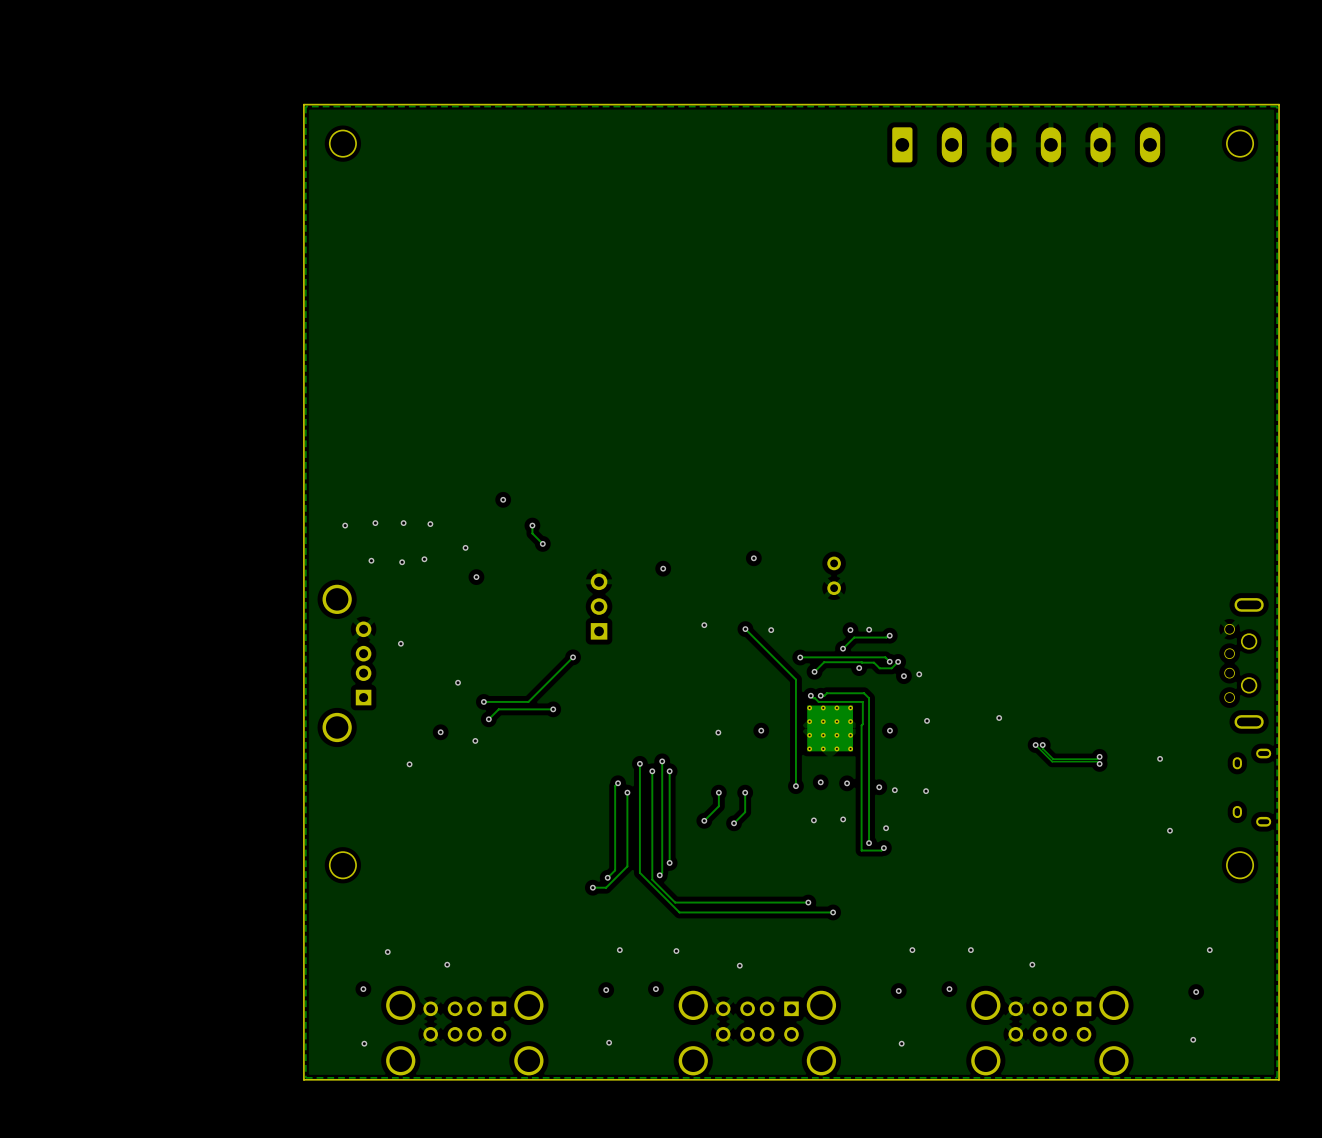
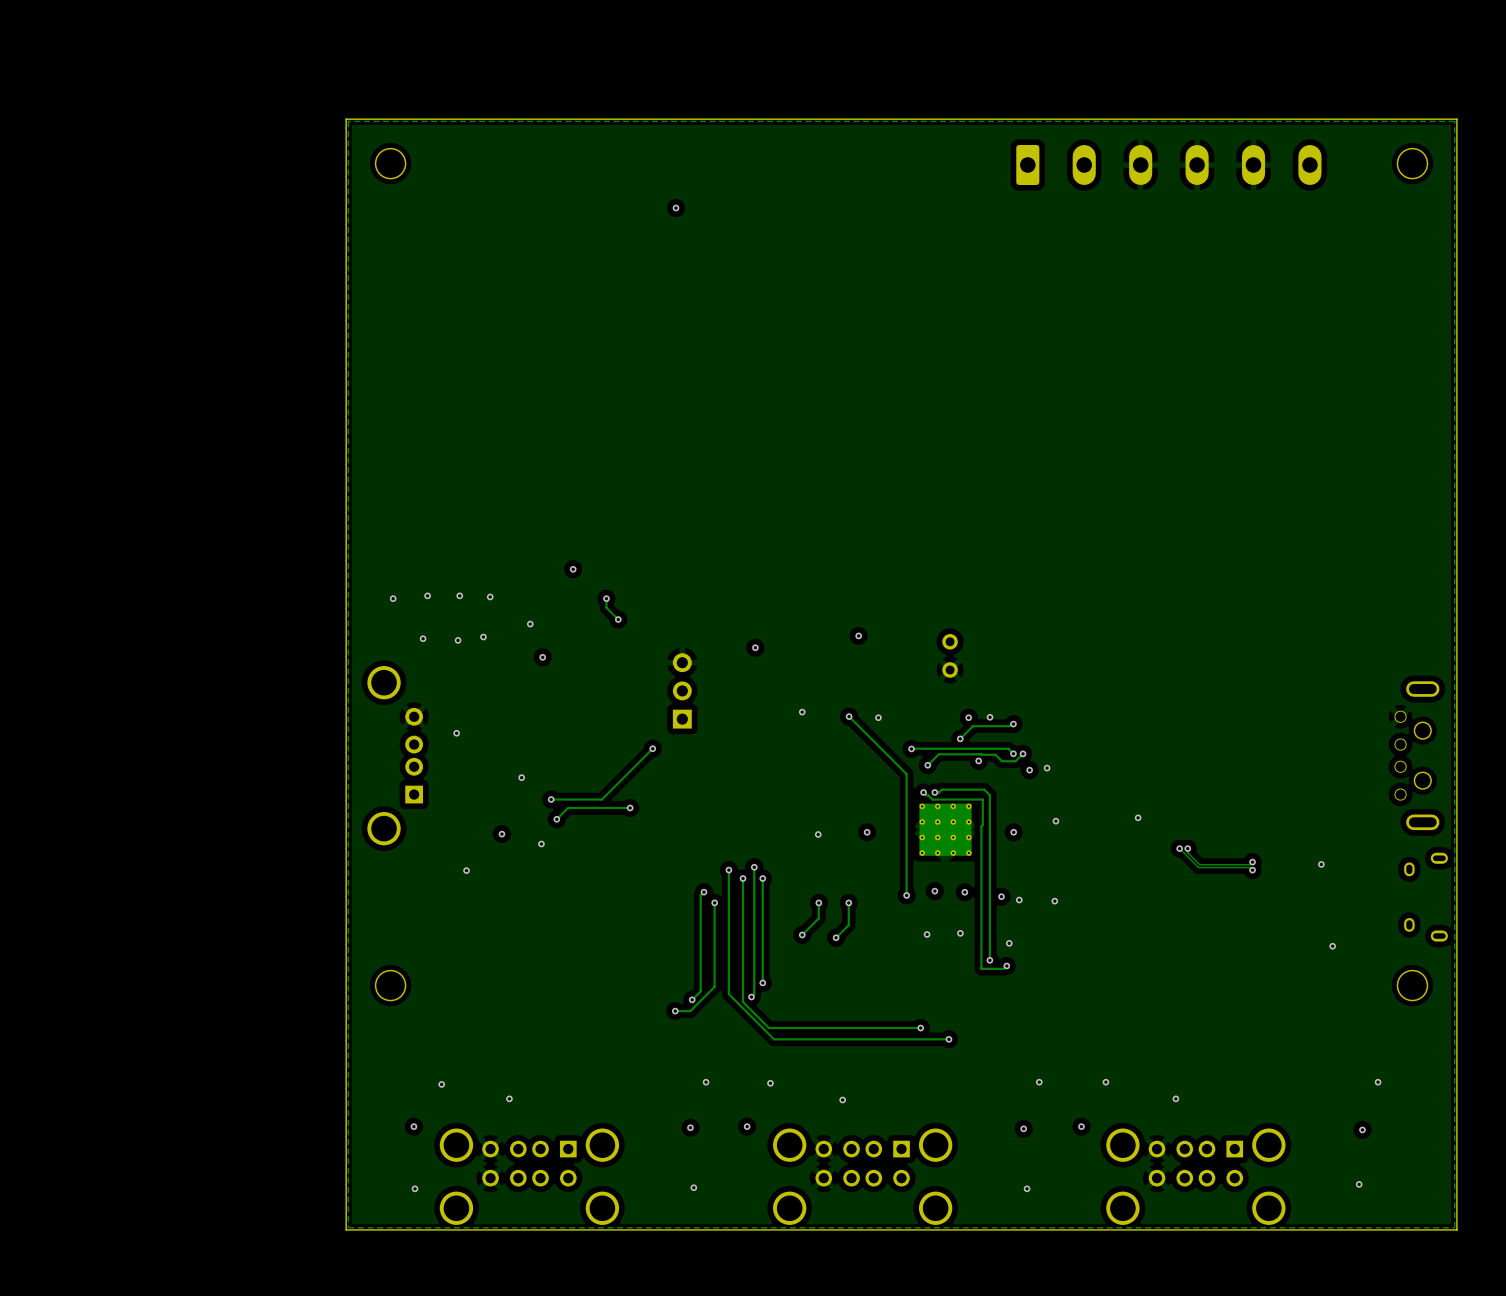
via: none -> (676, 208)

